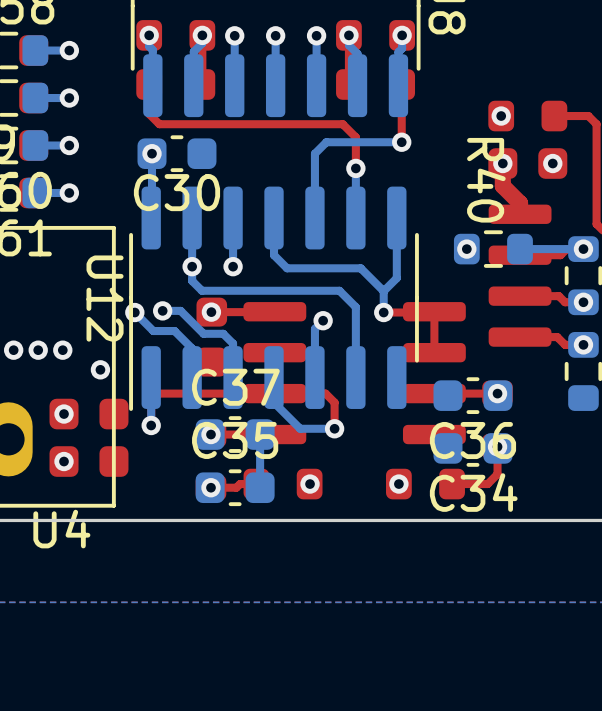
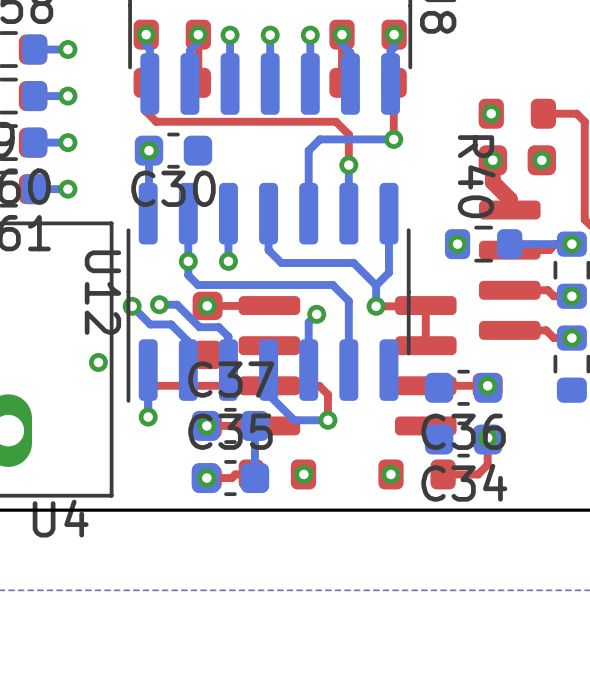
via: (13, 350) -> none
via: (38, 350) -> none
via: (62, 350) -> none
via: (64, 414) -> none
part: (88, 414) -> none
via: (64, 461) -> none
part: (88, 461) -> none

